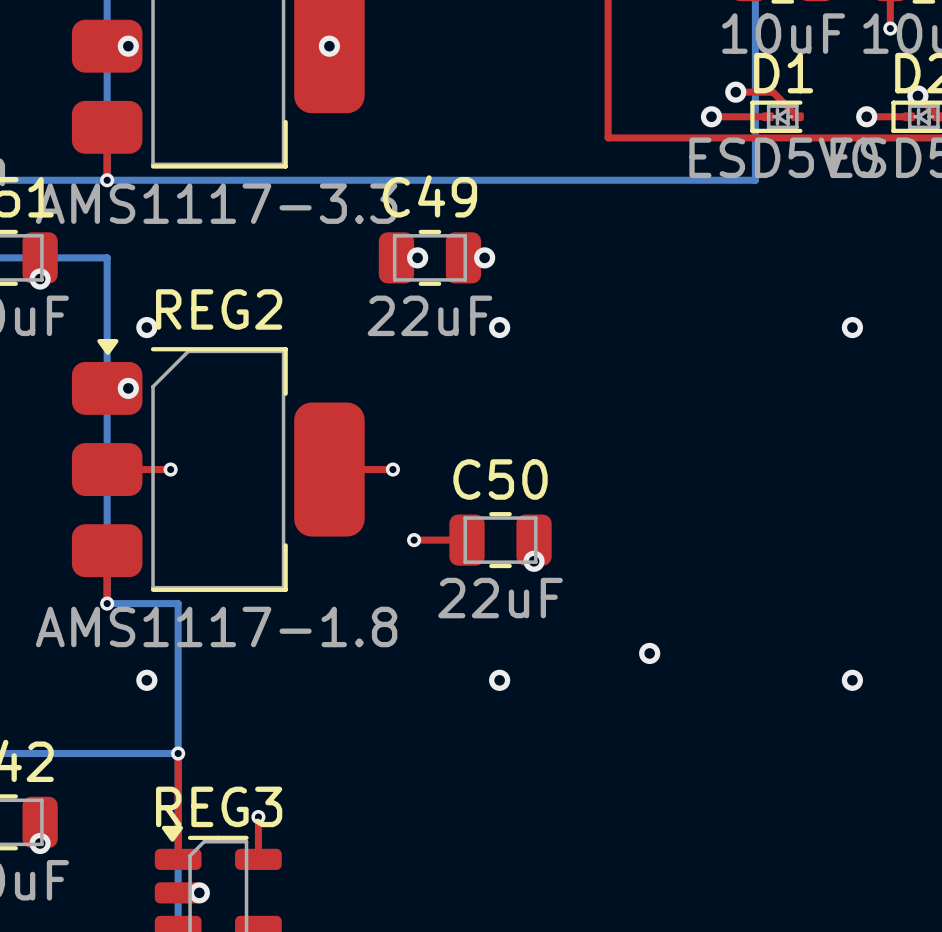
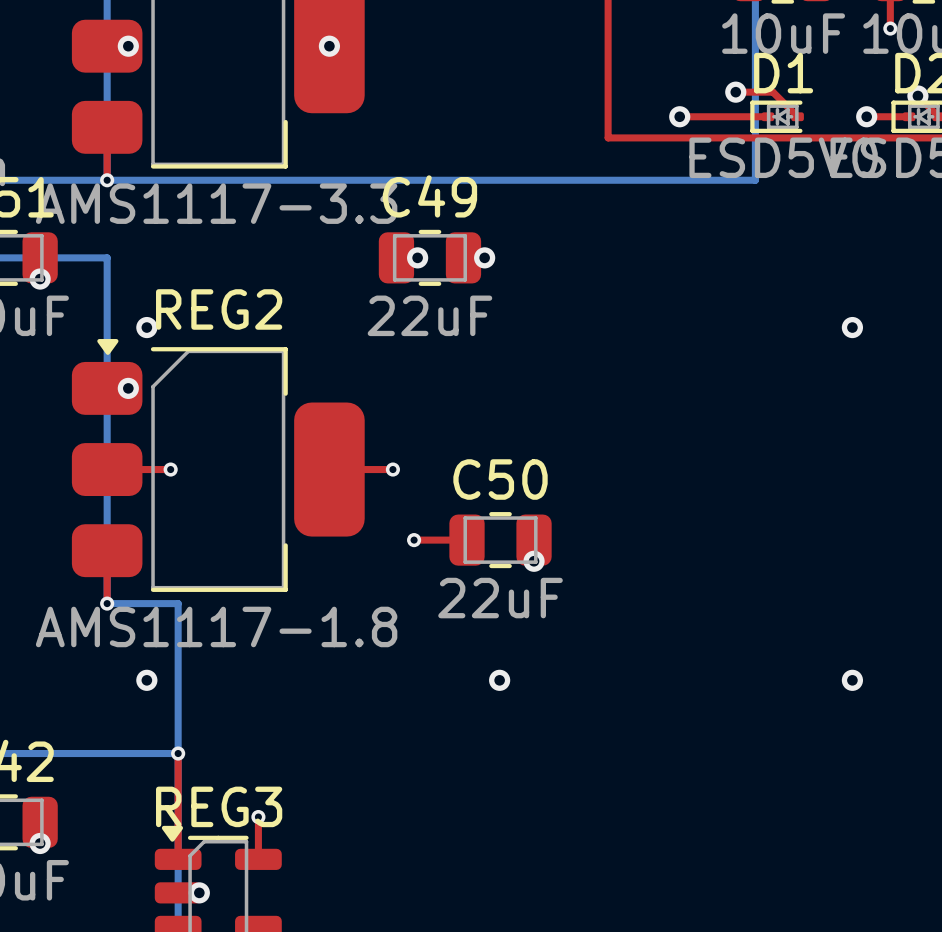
top track: none -> (679, 116) (711, 116)
via position: (711, 116) -> (679, 116)
via: (499, 327) -> none
via: (649, 653) -> none

